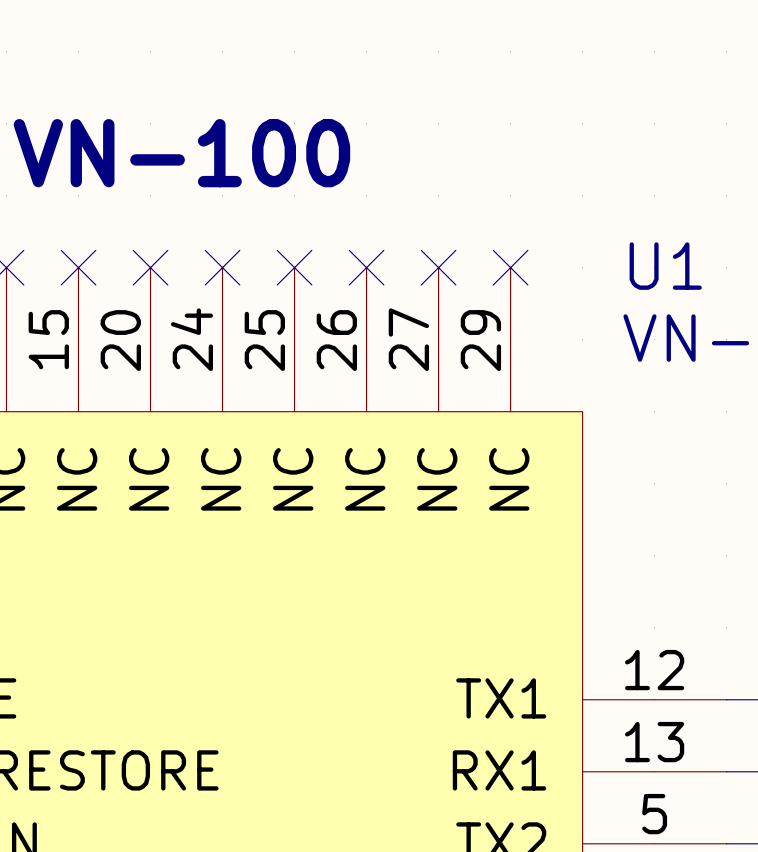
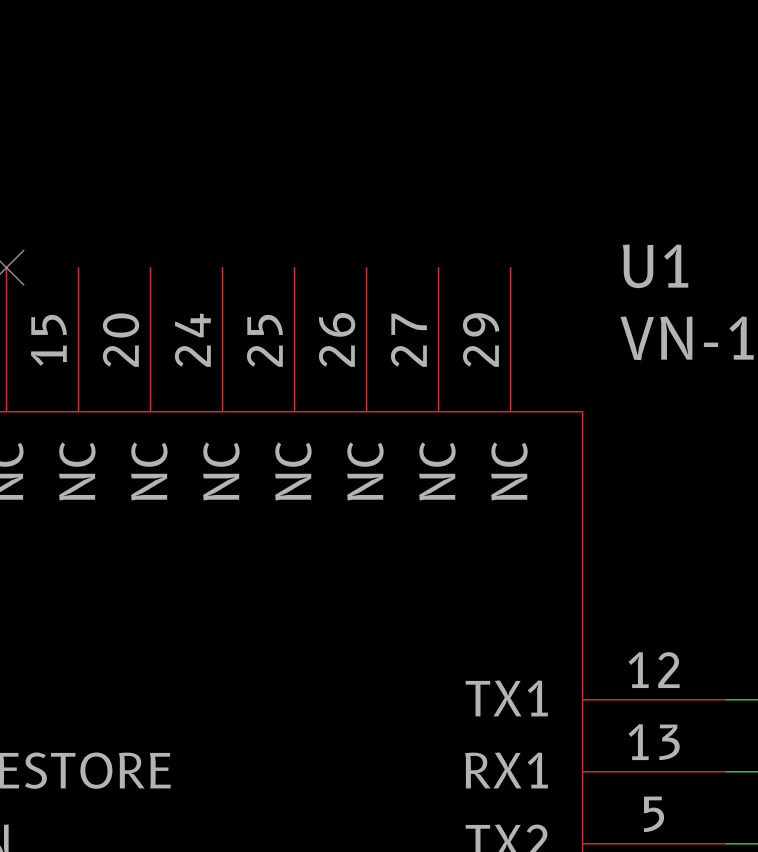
text: VN-100 (181, 153) -> none
no-connect mark: (78, 267) -> none
no-connect mark: (150, 267) -> none
no-connect mark: (222, 267) -> none
no-connect mark: (294, 267) -> none
no-connect mark: (366, 267) -> none
no-connect mark: (438, 267) -> none
no-connect mark: (510, 267) -> none

